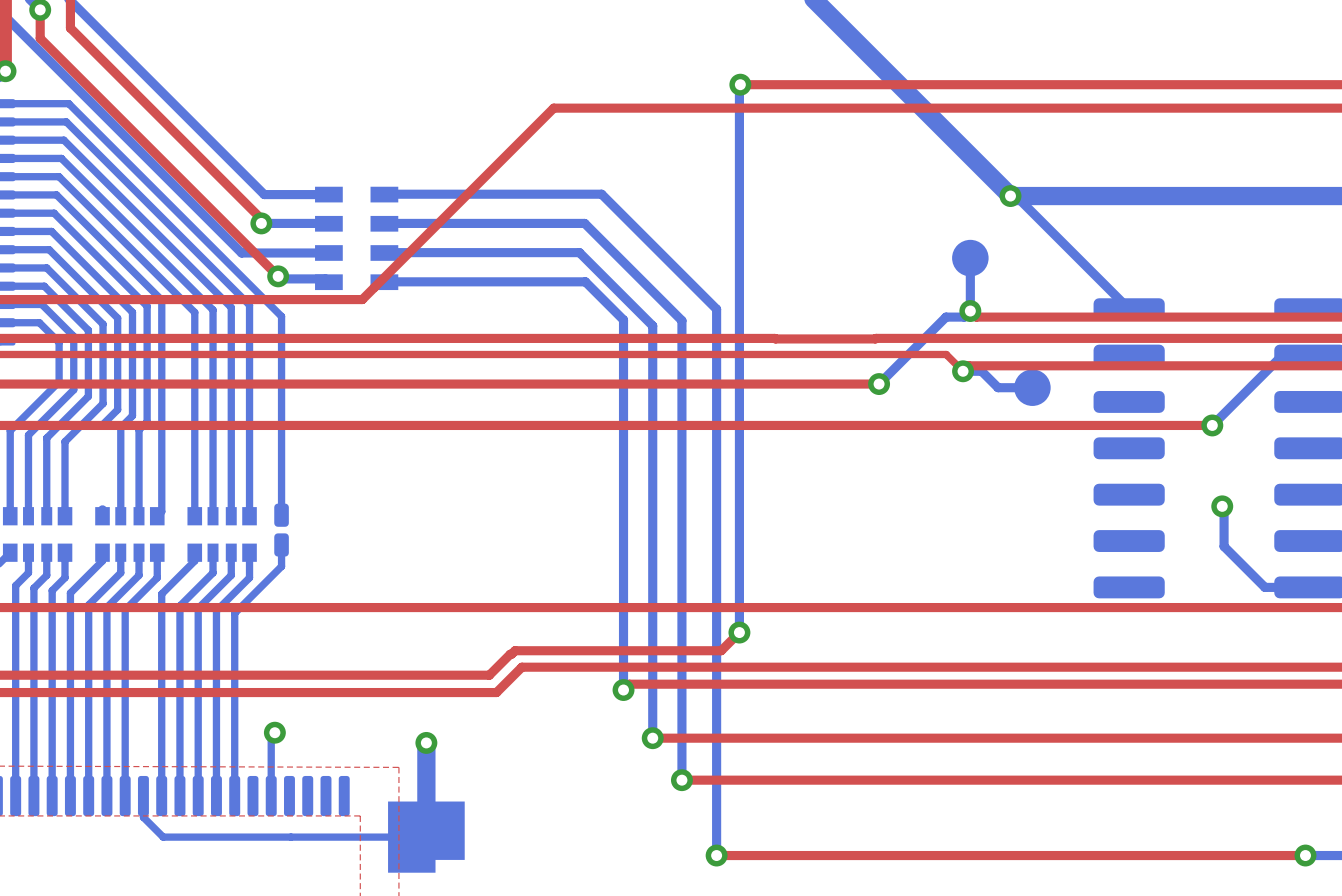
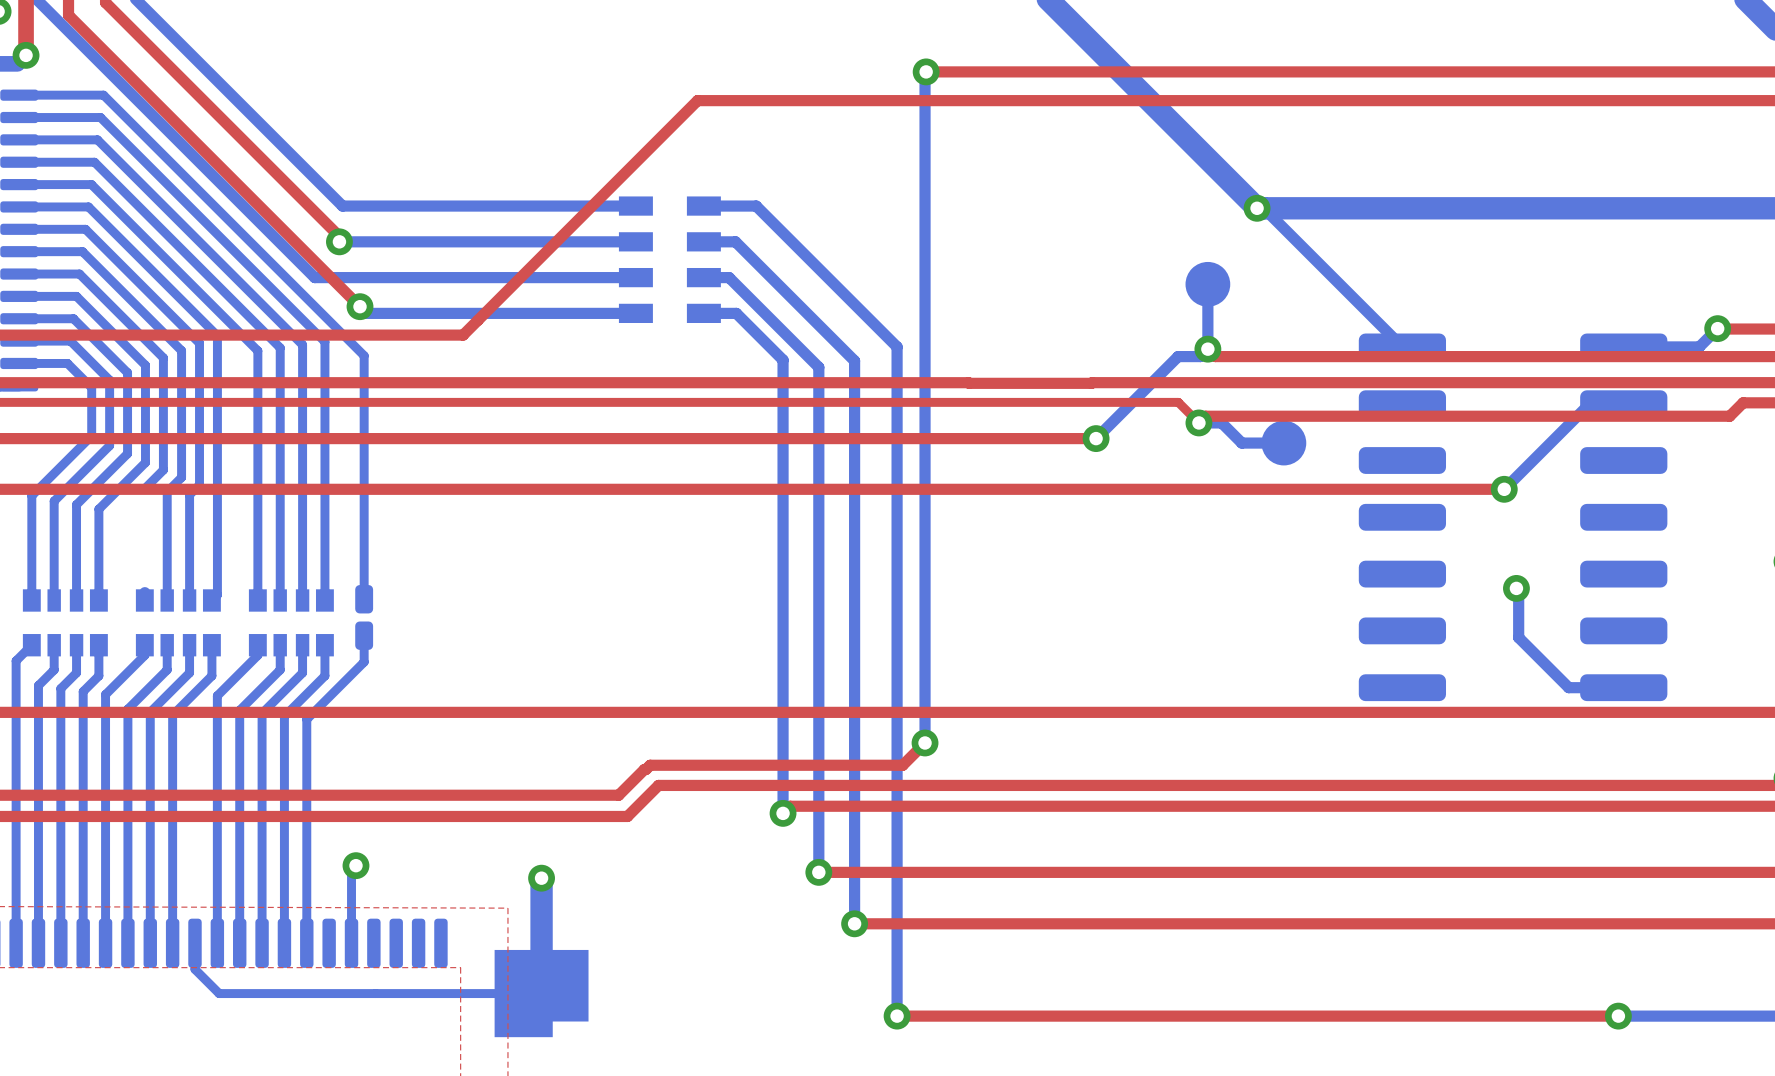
bottom track: (264, 194) (328, 194) -> (342, 206) (490, 206)
bottom track: (503, 194) (558, 194) -> none
bottom track: (503, 223) (558, 223) -> (421, 241) (490, 241)
part position: (356, 238) -> (669, 259)
bottom track: (241, 252) (328, 252) -> (314, 277) (490, 277)
bottom track: (503, 252) (558, 252) -> none
bottom track: (280, 278) (325, 278) (328, 282) -> (363, 309) (366, 313) (490, 313)
bottom track: (503, 281) (558, 281) -> none

